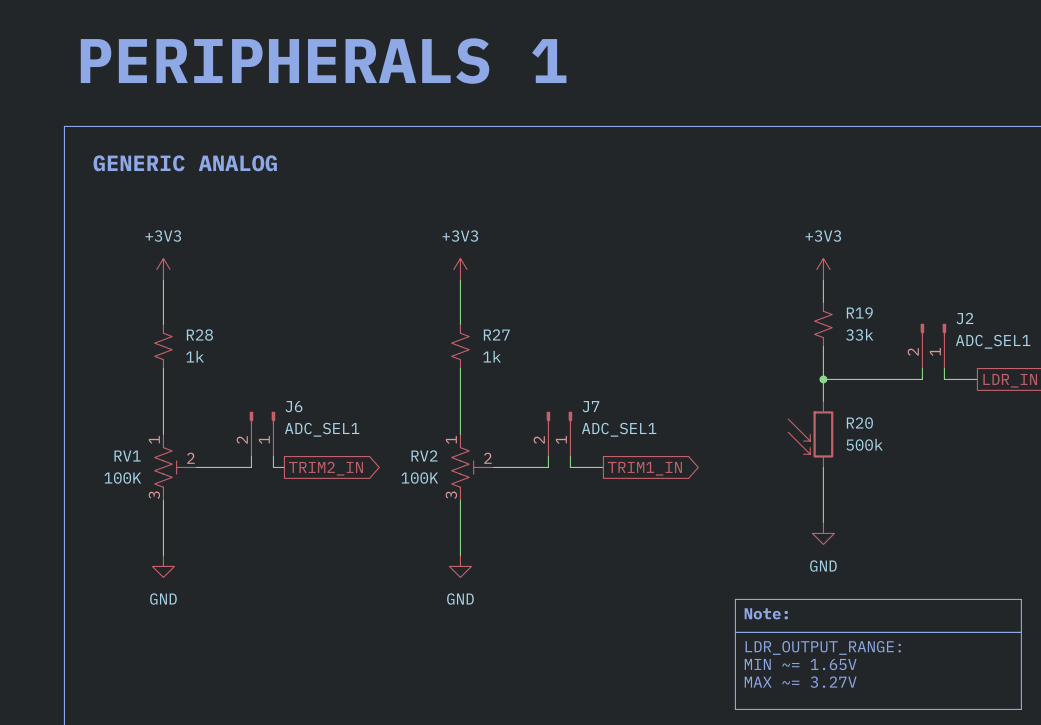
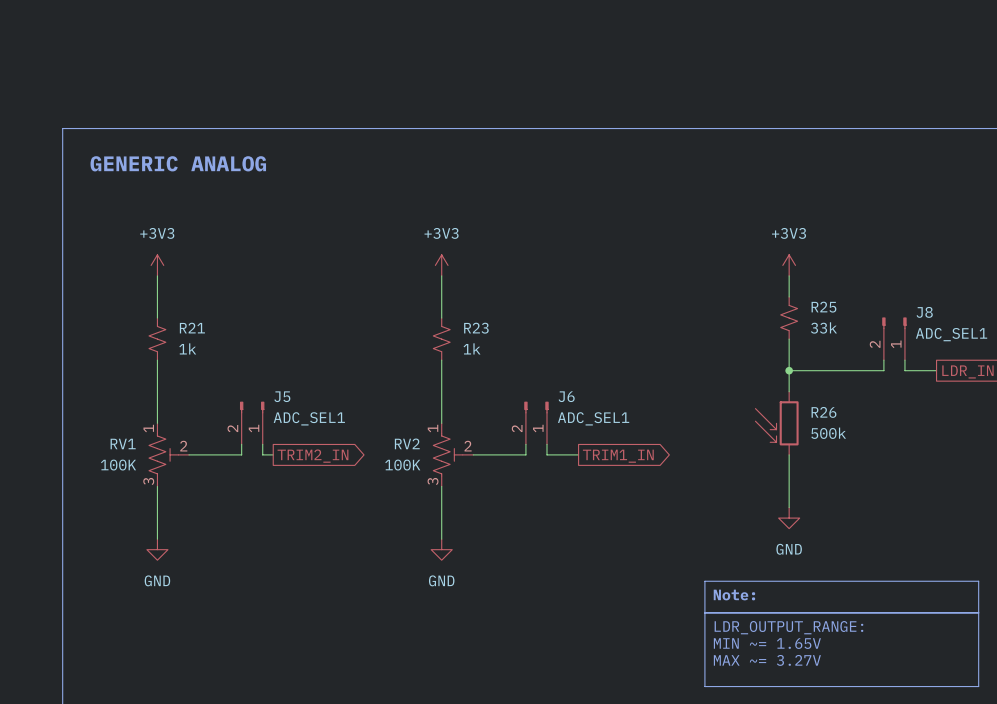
text: PERIPHERALS 1 (323, 61) -> none
R19 name: R19 (859, 312) -> R25 (823, 307)
J2 name: J2 (964, 318) -> J8 (924, 312)
R27 name: R27 (496, 334) -> R23 (476, 328)
R28 name: R28 (199, 335) -> R21 (192, 328)
J6 name: J6 (293, 406) -> J5 (282, 396)
J7 name: J7 (590, 406) -> J6 (566, 396)
R20 name: R20 (859, 423) -> R26 (823, 412)

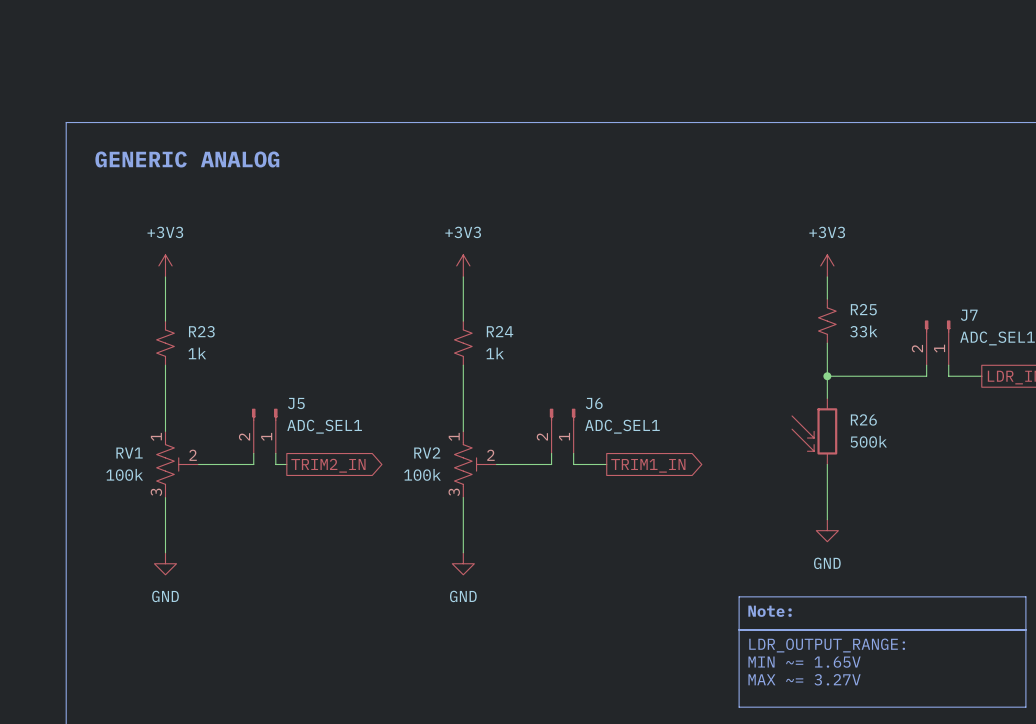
J8 name: J8 (924, 312) -> J7 (969, 315)
R21 name: R21 (192, 328) -> R23 (201, 331)
R23 name: R23 (476, 328) -> R24 (500, 331)
RV1 value: 100K (118, 465) -> 100k (124, 474)
RV2 value: 100K (402, 465) -> 100k (422, 474)

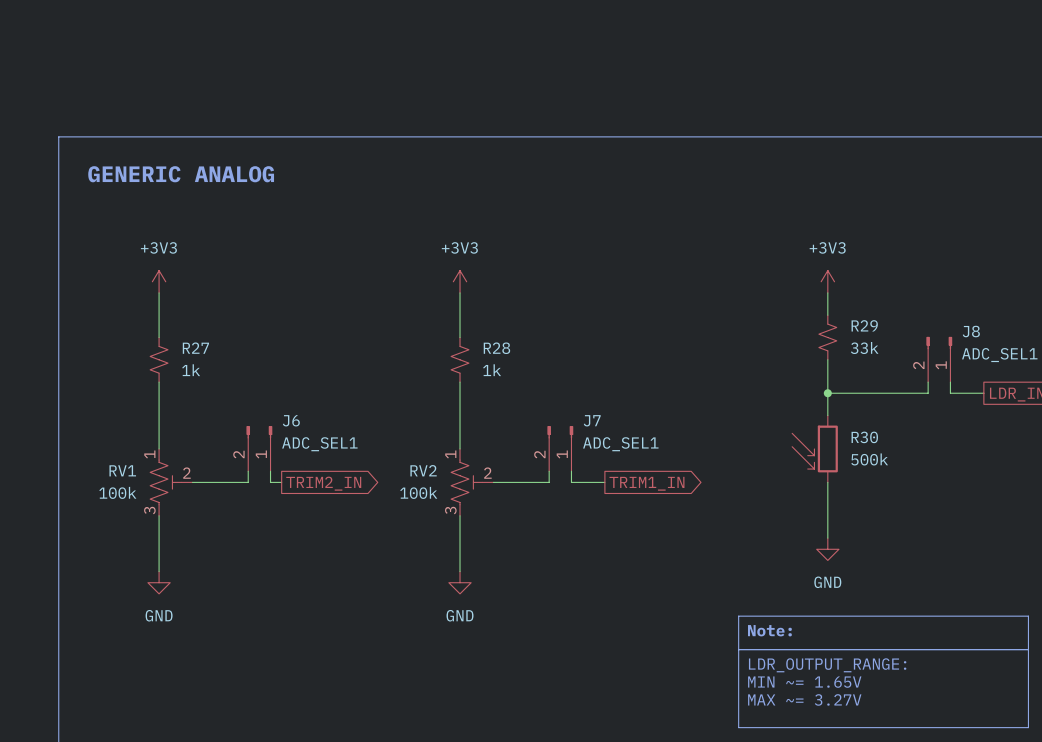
R25 name: R25 (863, 309) -> R29 (864, 325)
J7 name: J7 (969, 315) -> J8 (971, 331)
R23 name: R23 (201, 331) -> R27 (195, 348)
R24 name: R24 (500, 331) -> R28 (496, 348)
J5 name: J5 (296, 403) -> J6 (291, 420)
J6 name: J6 (594, 403) -> J7 (592, 420)
R26 name: R26 (863, 419) -> R30 (864, 437)

